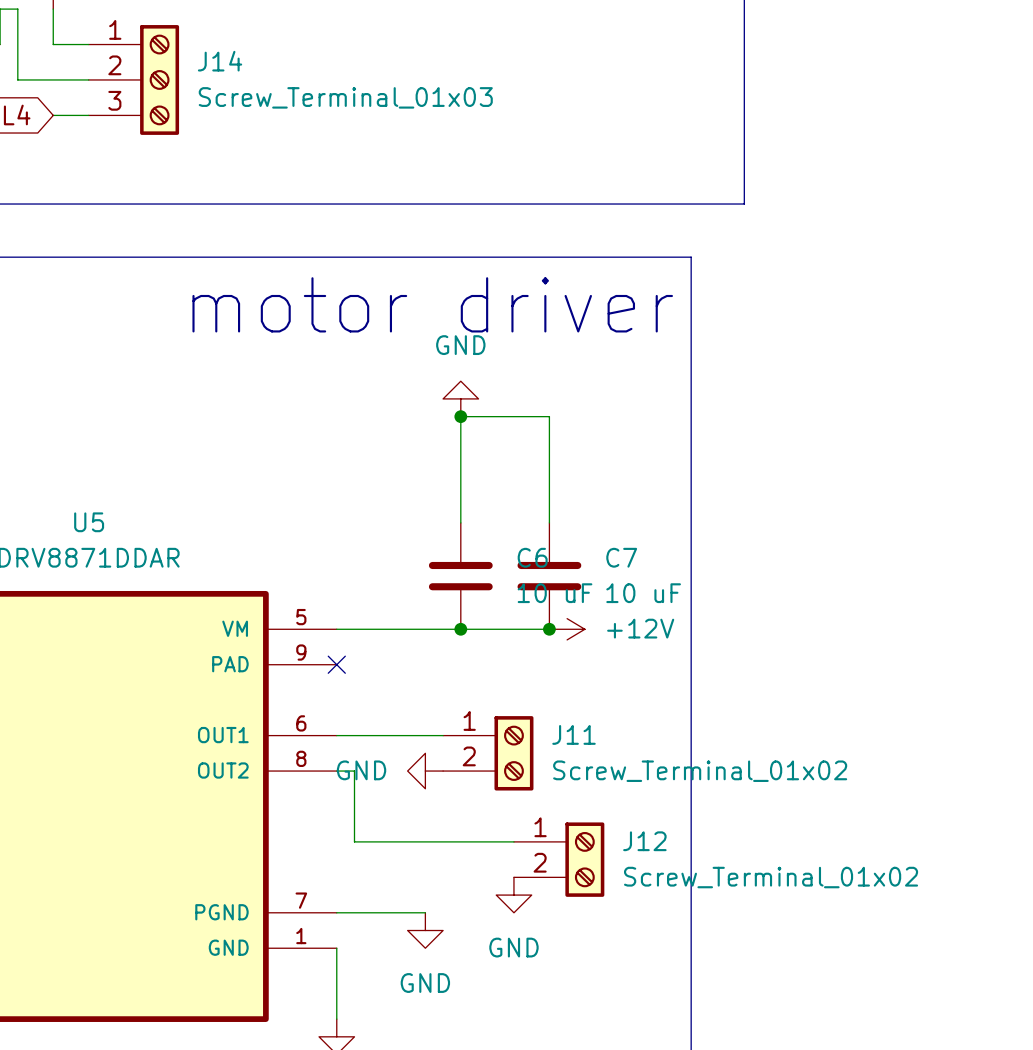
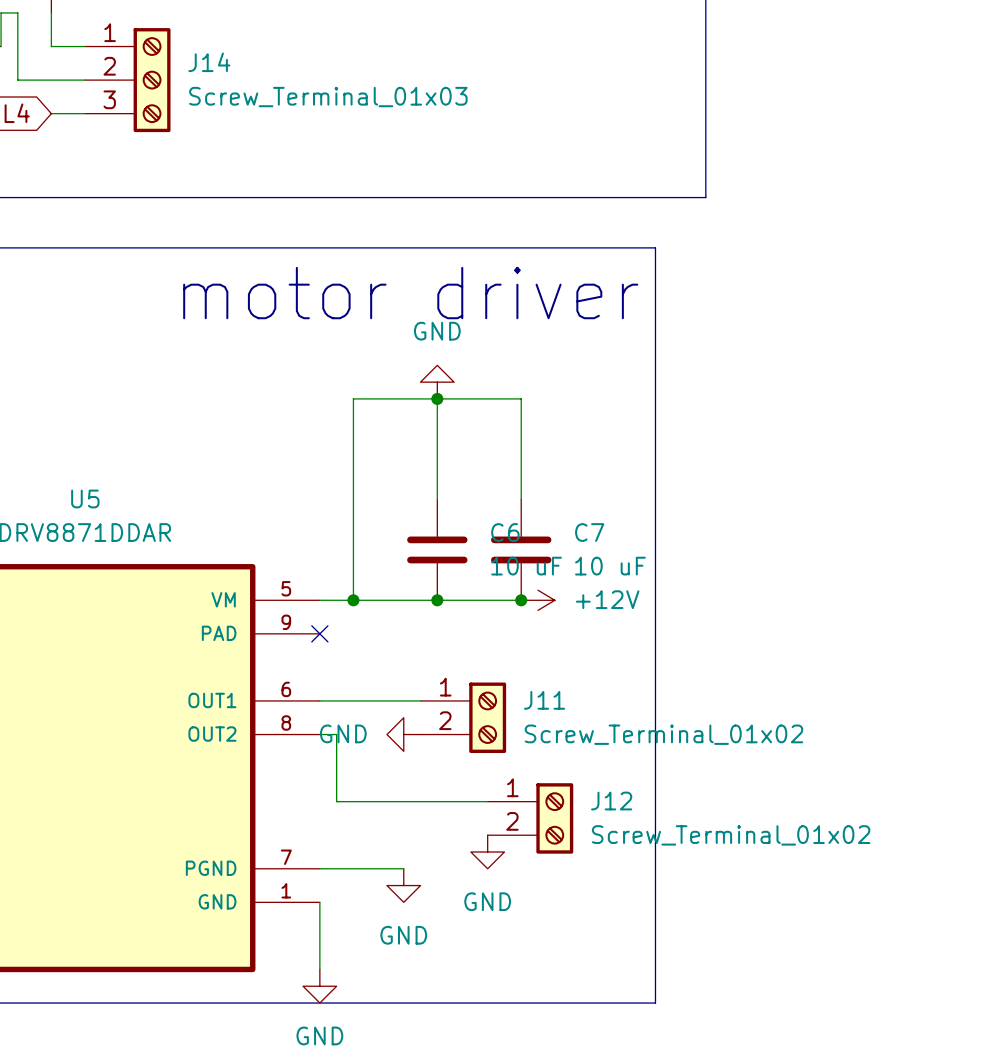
wire: none -> (437, 398) (353, 398) (353, 600)
junction: none -> (353, 600)

